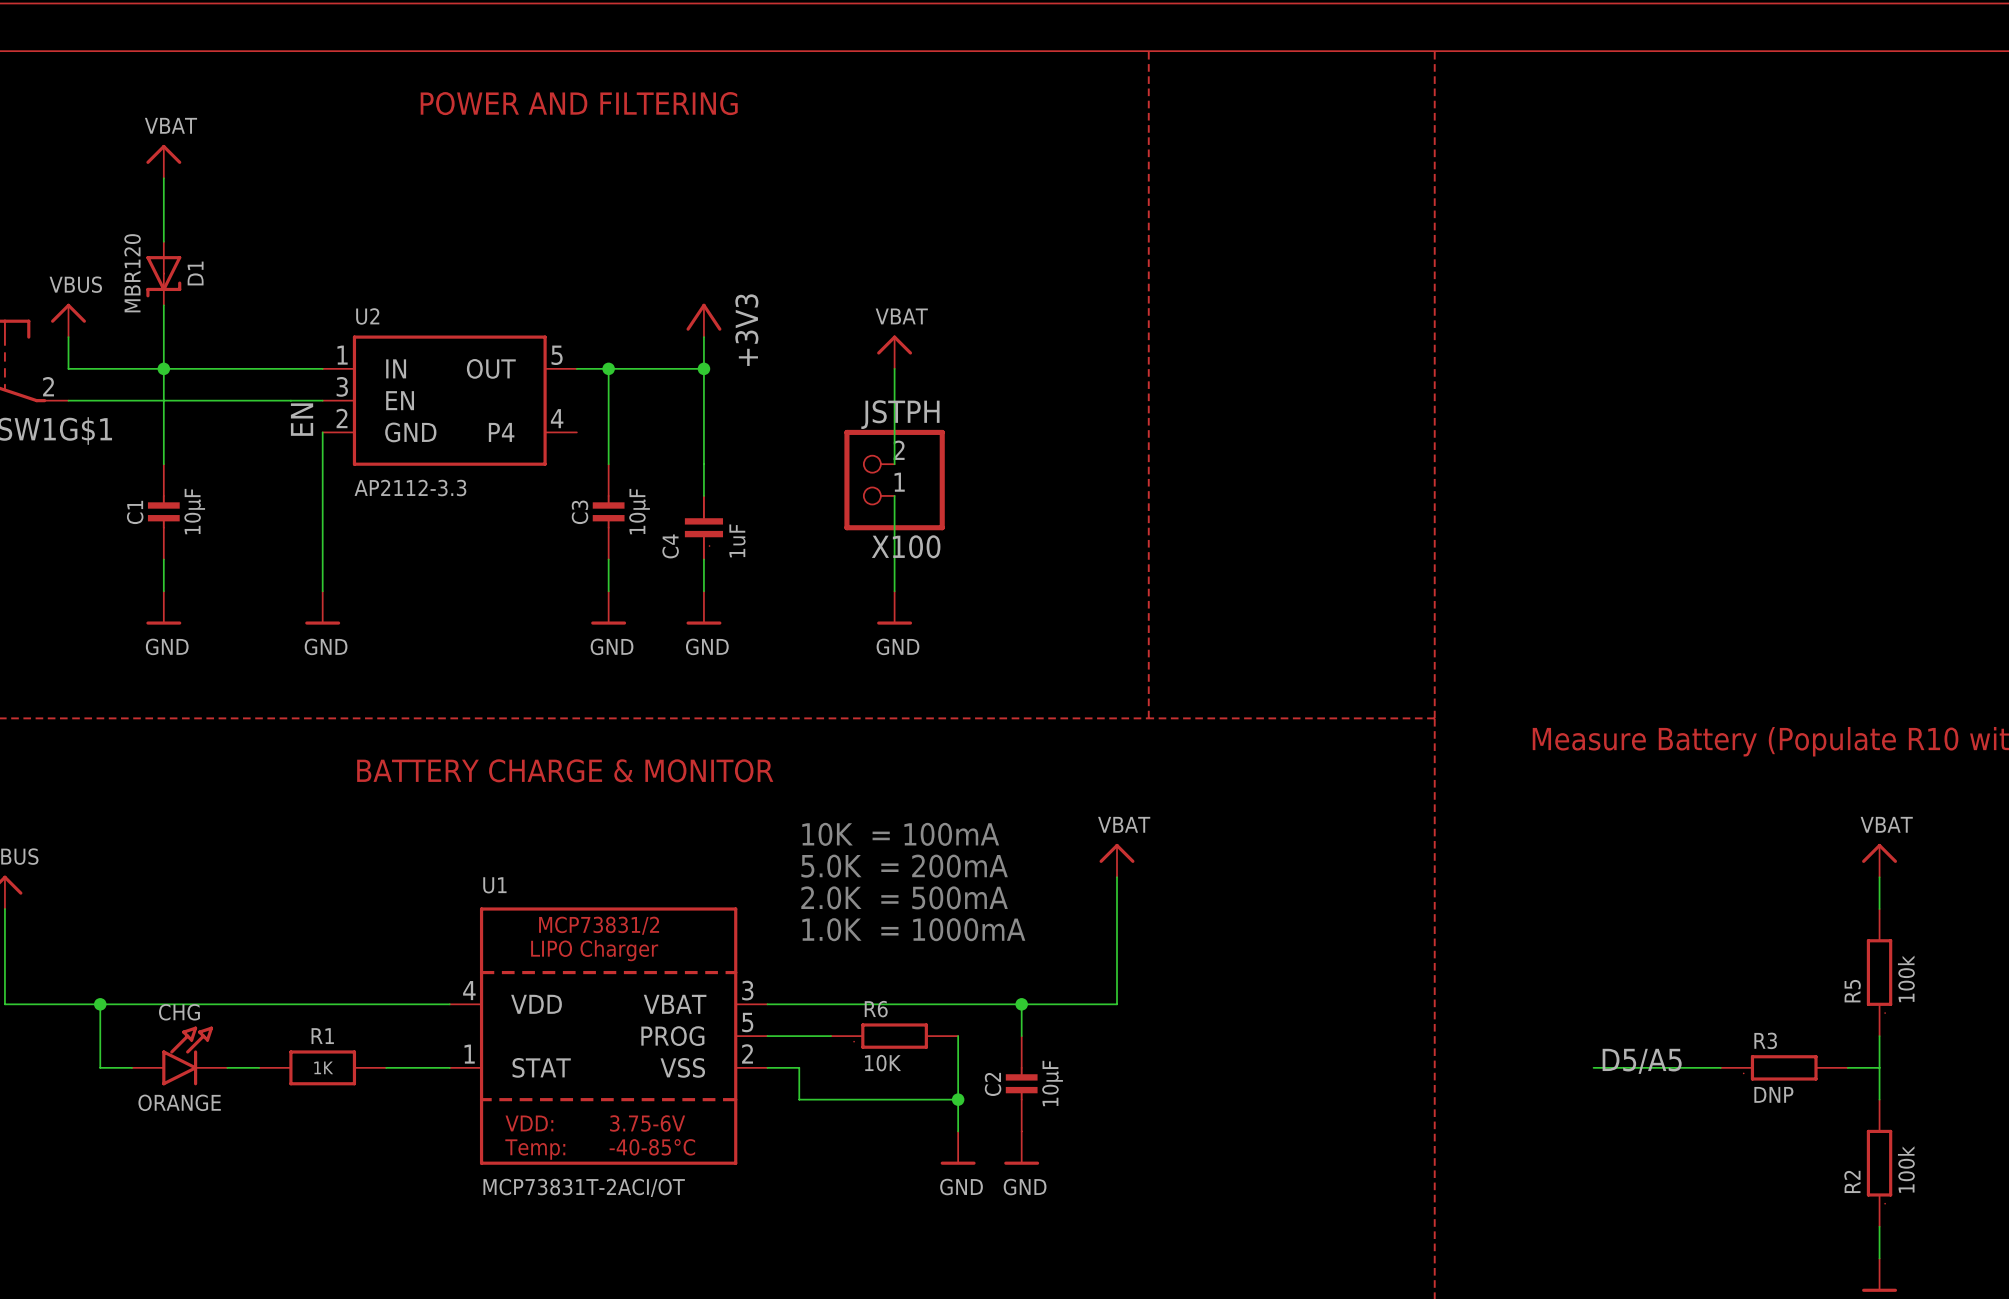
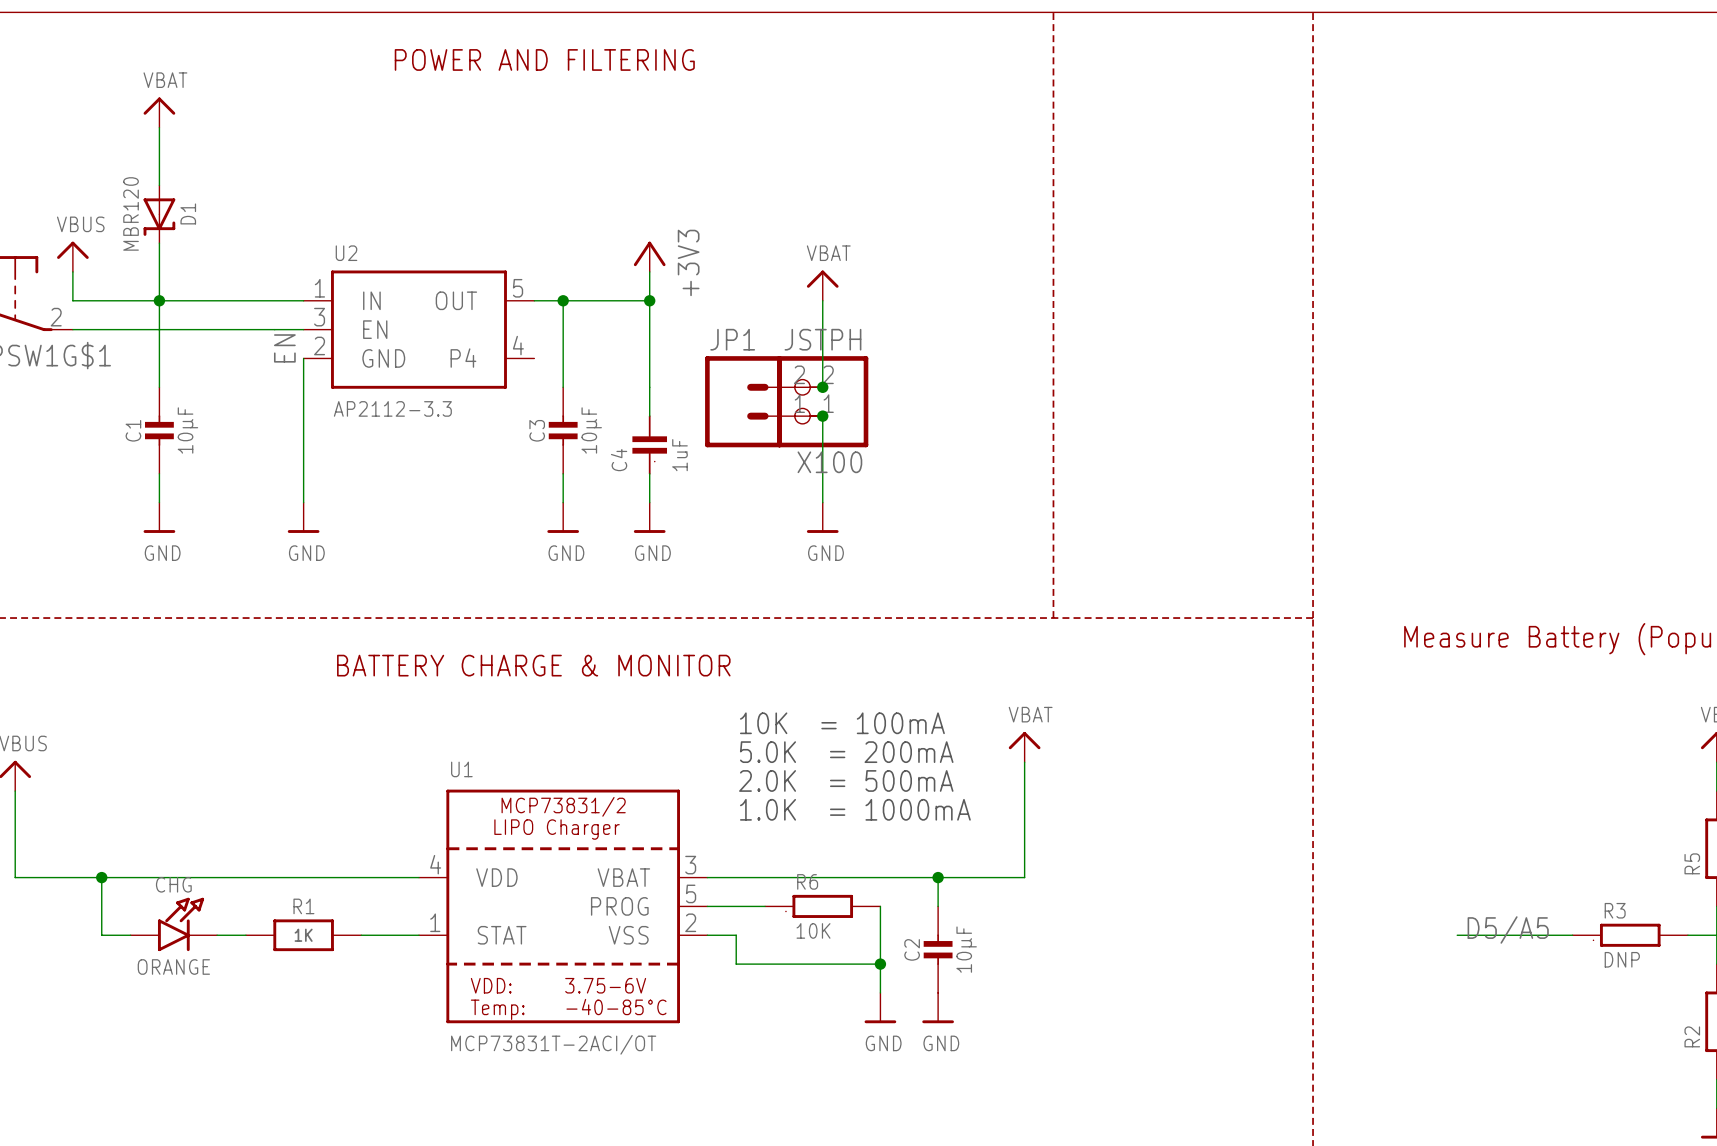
junction: none -> (822, 387)
JP1: none -> (763, 401)
junction: none -> (822, 416)

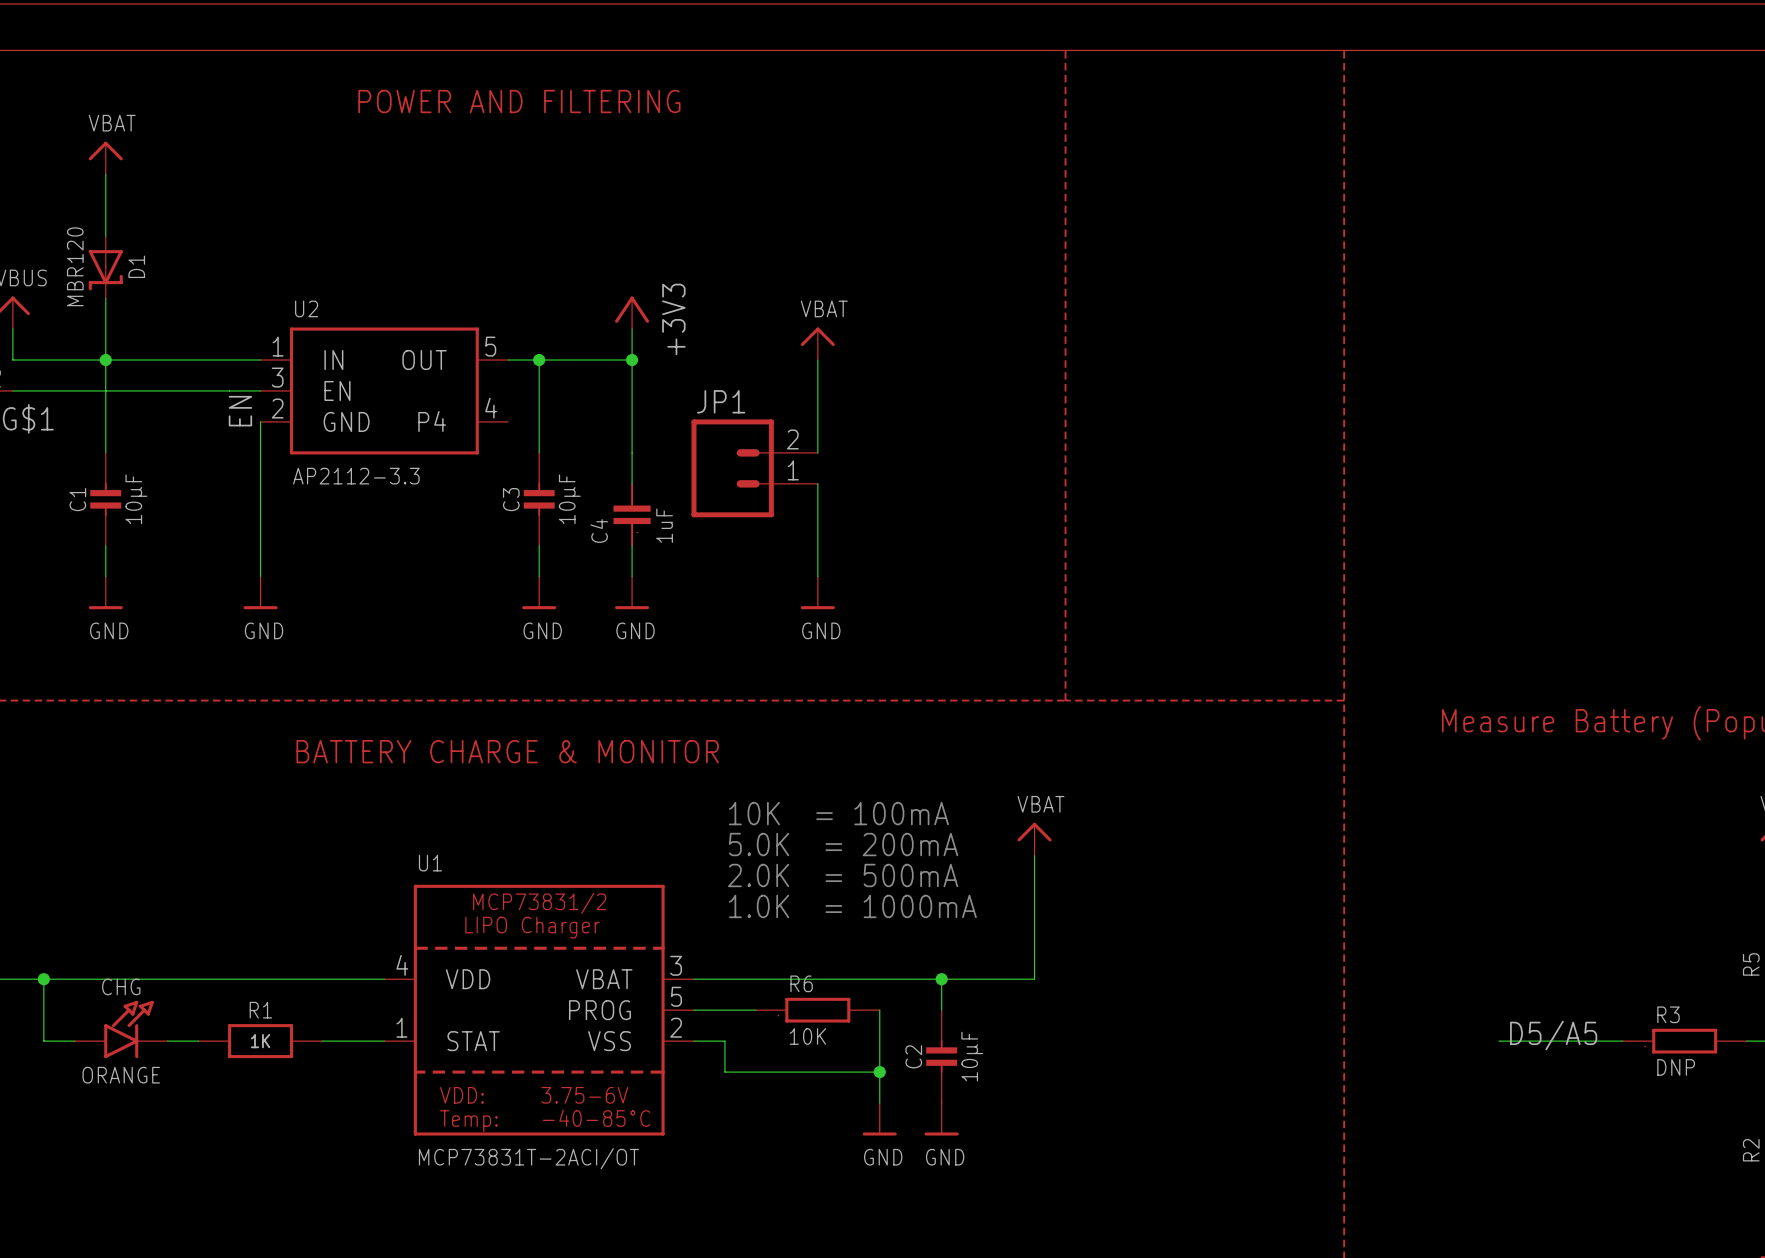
junction: (822, 387) -> none
X100: JSTPH (822, 401) -> none
junction: (822, 416) -> none

